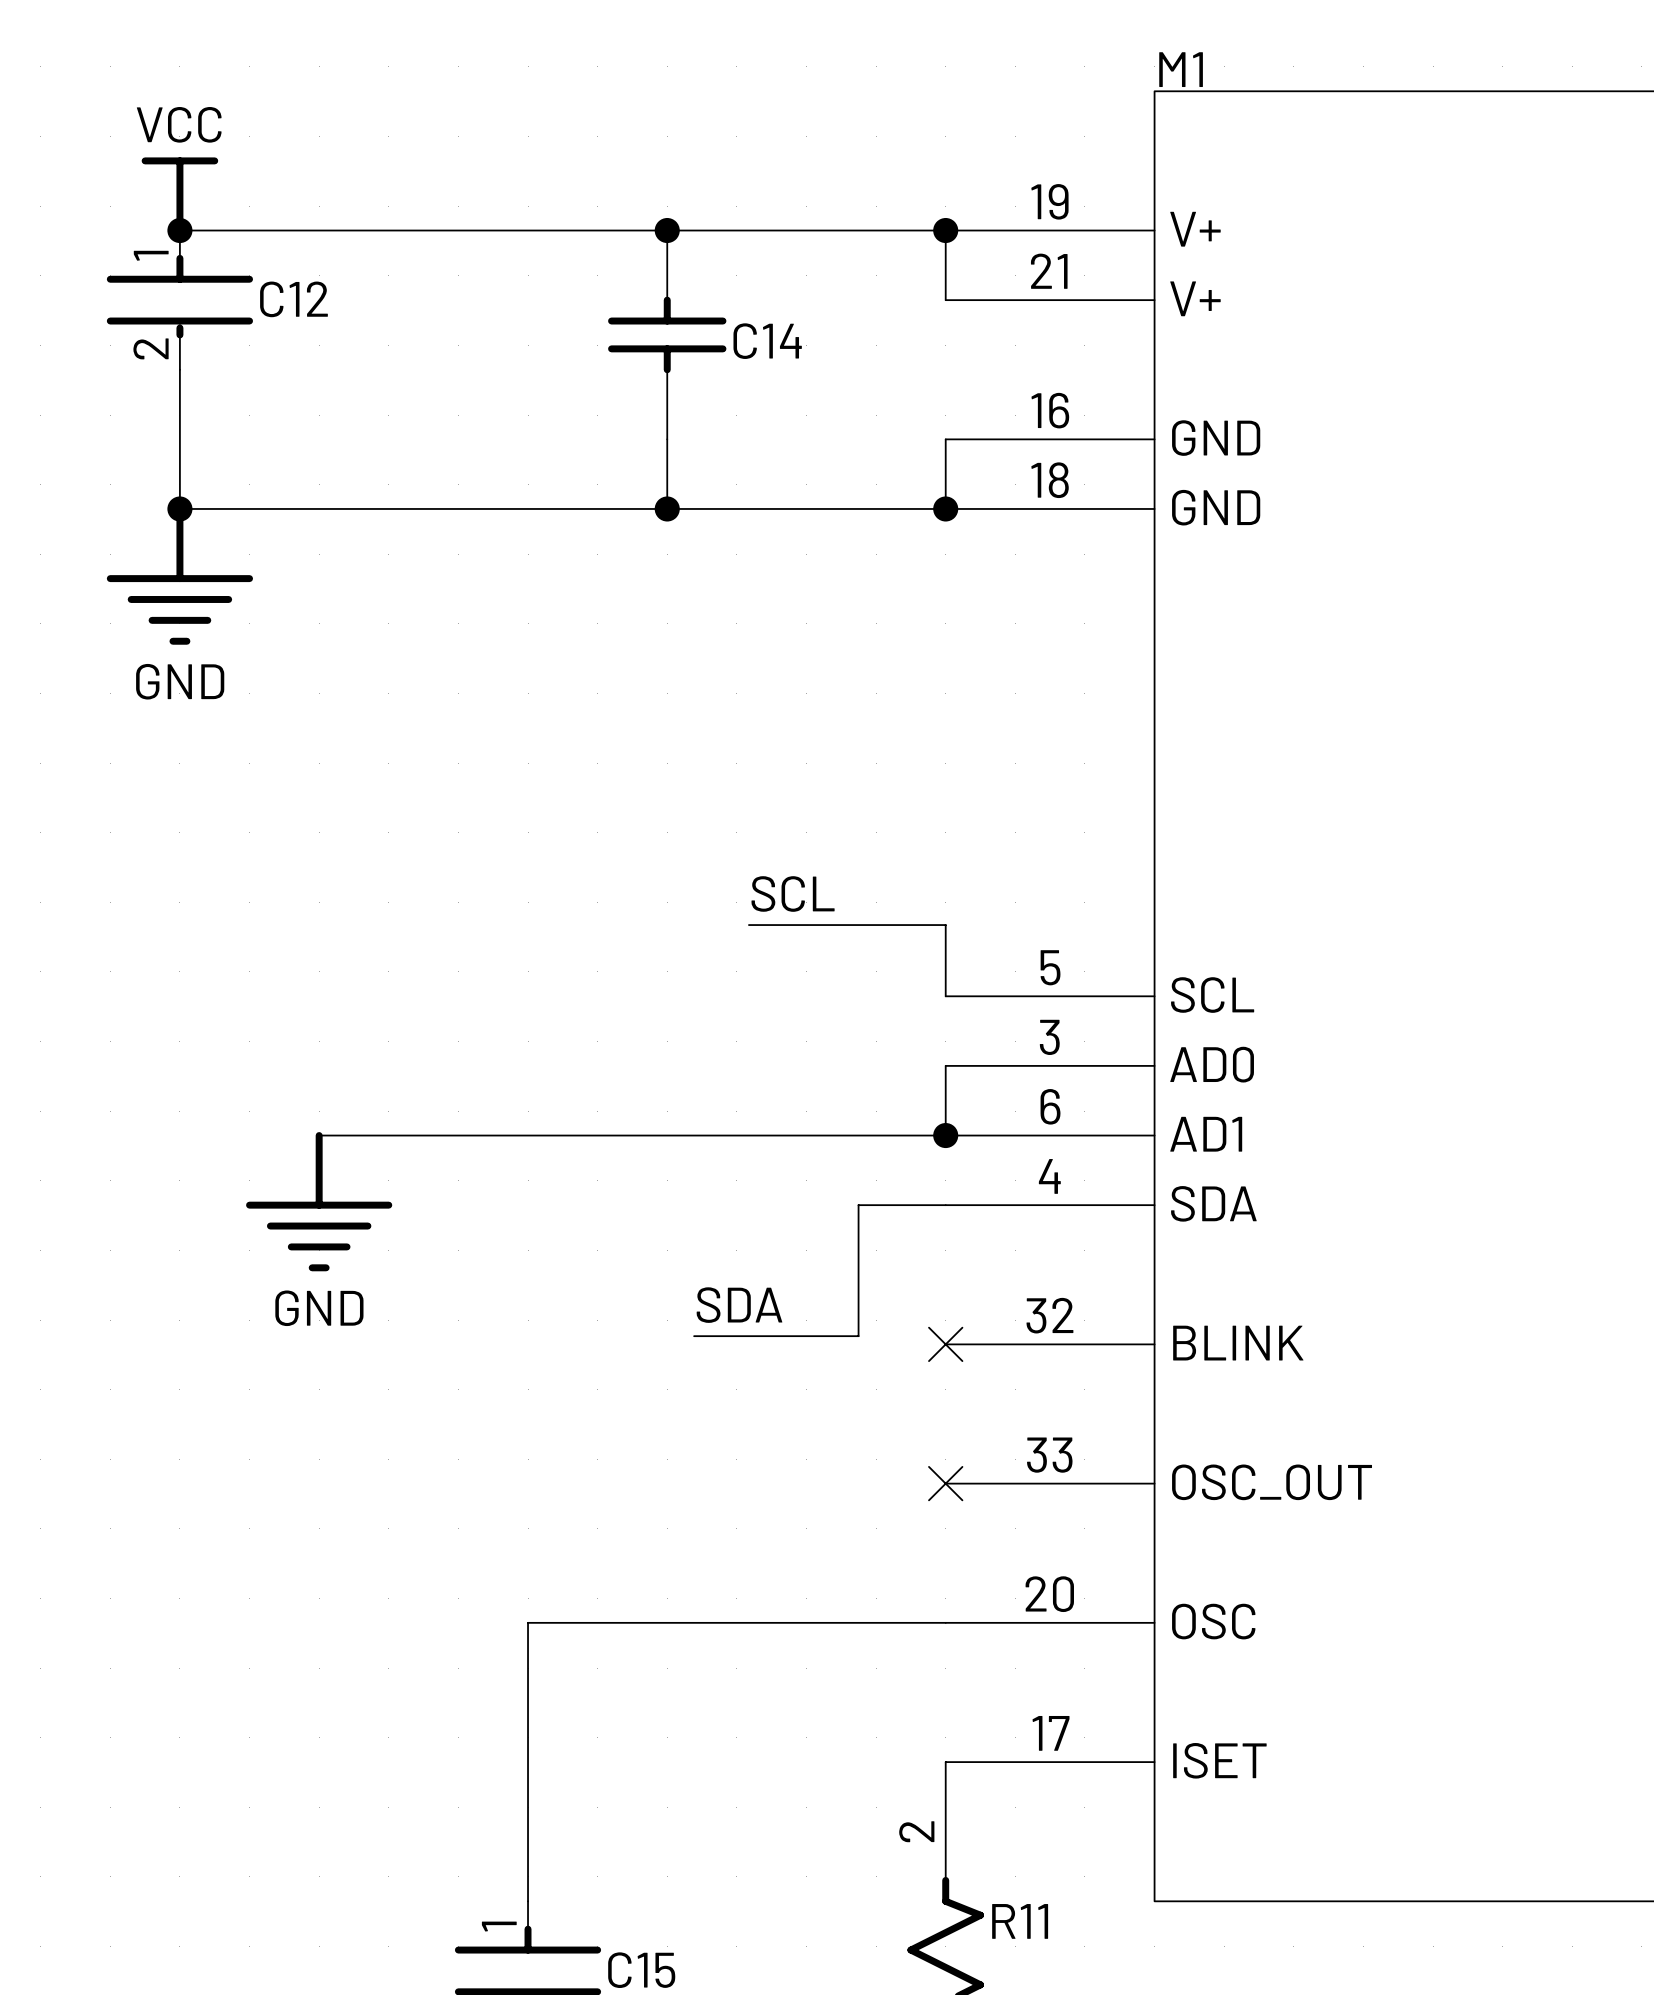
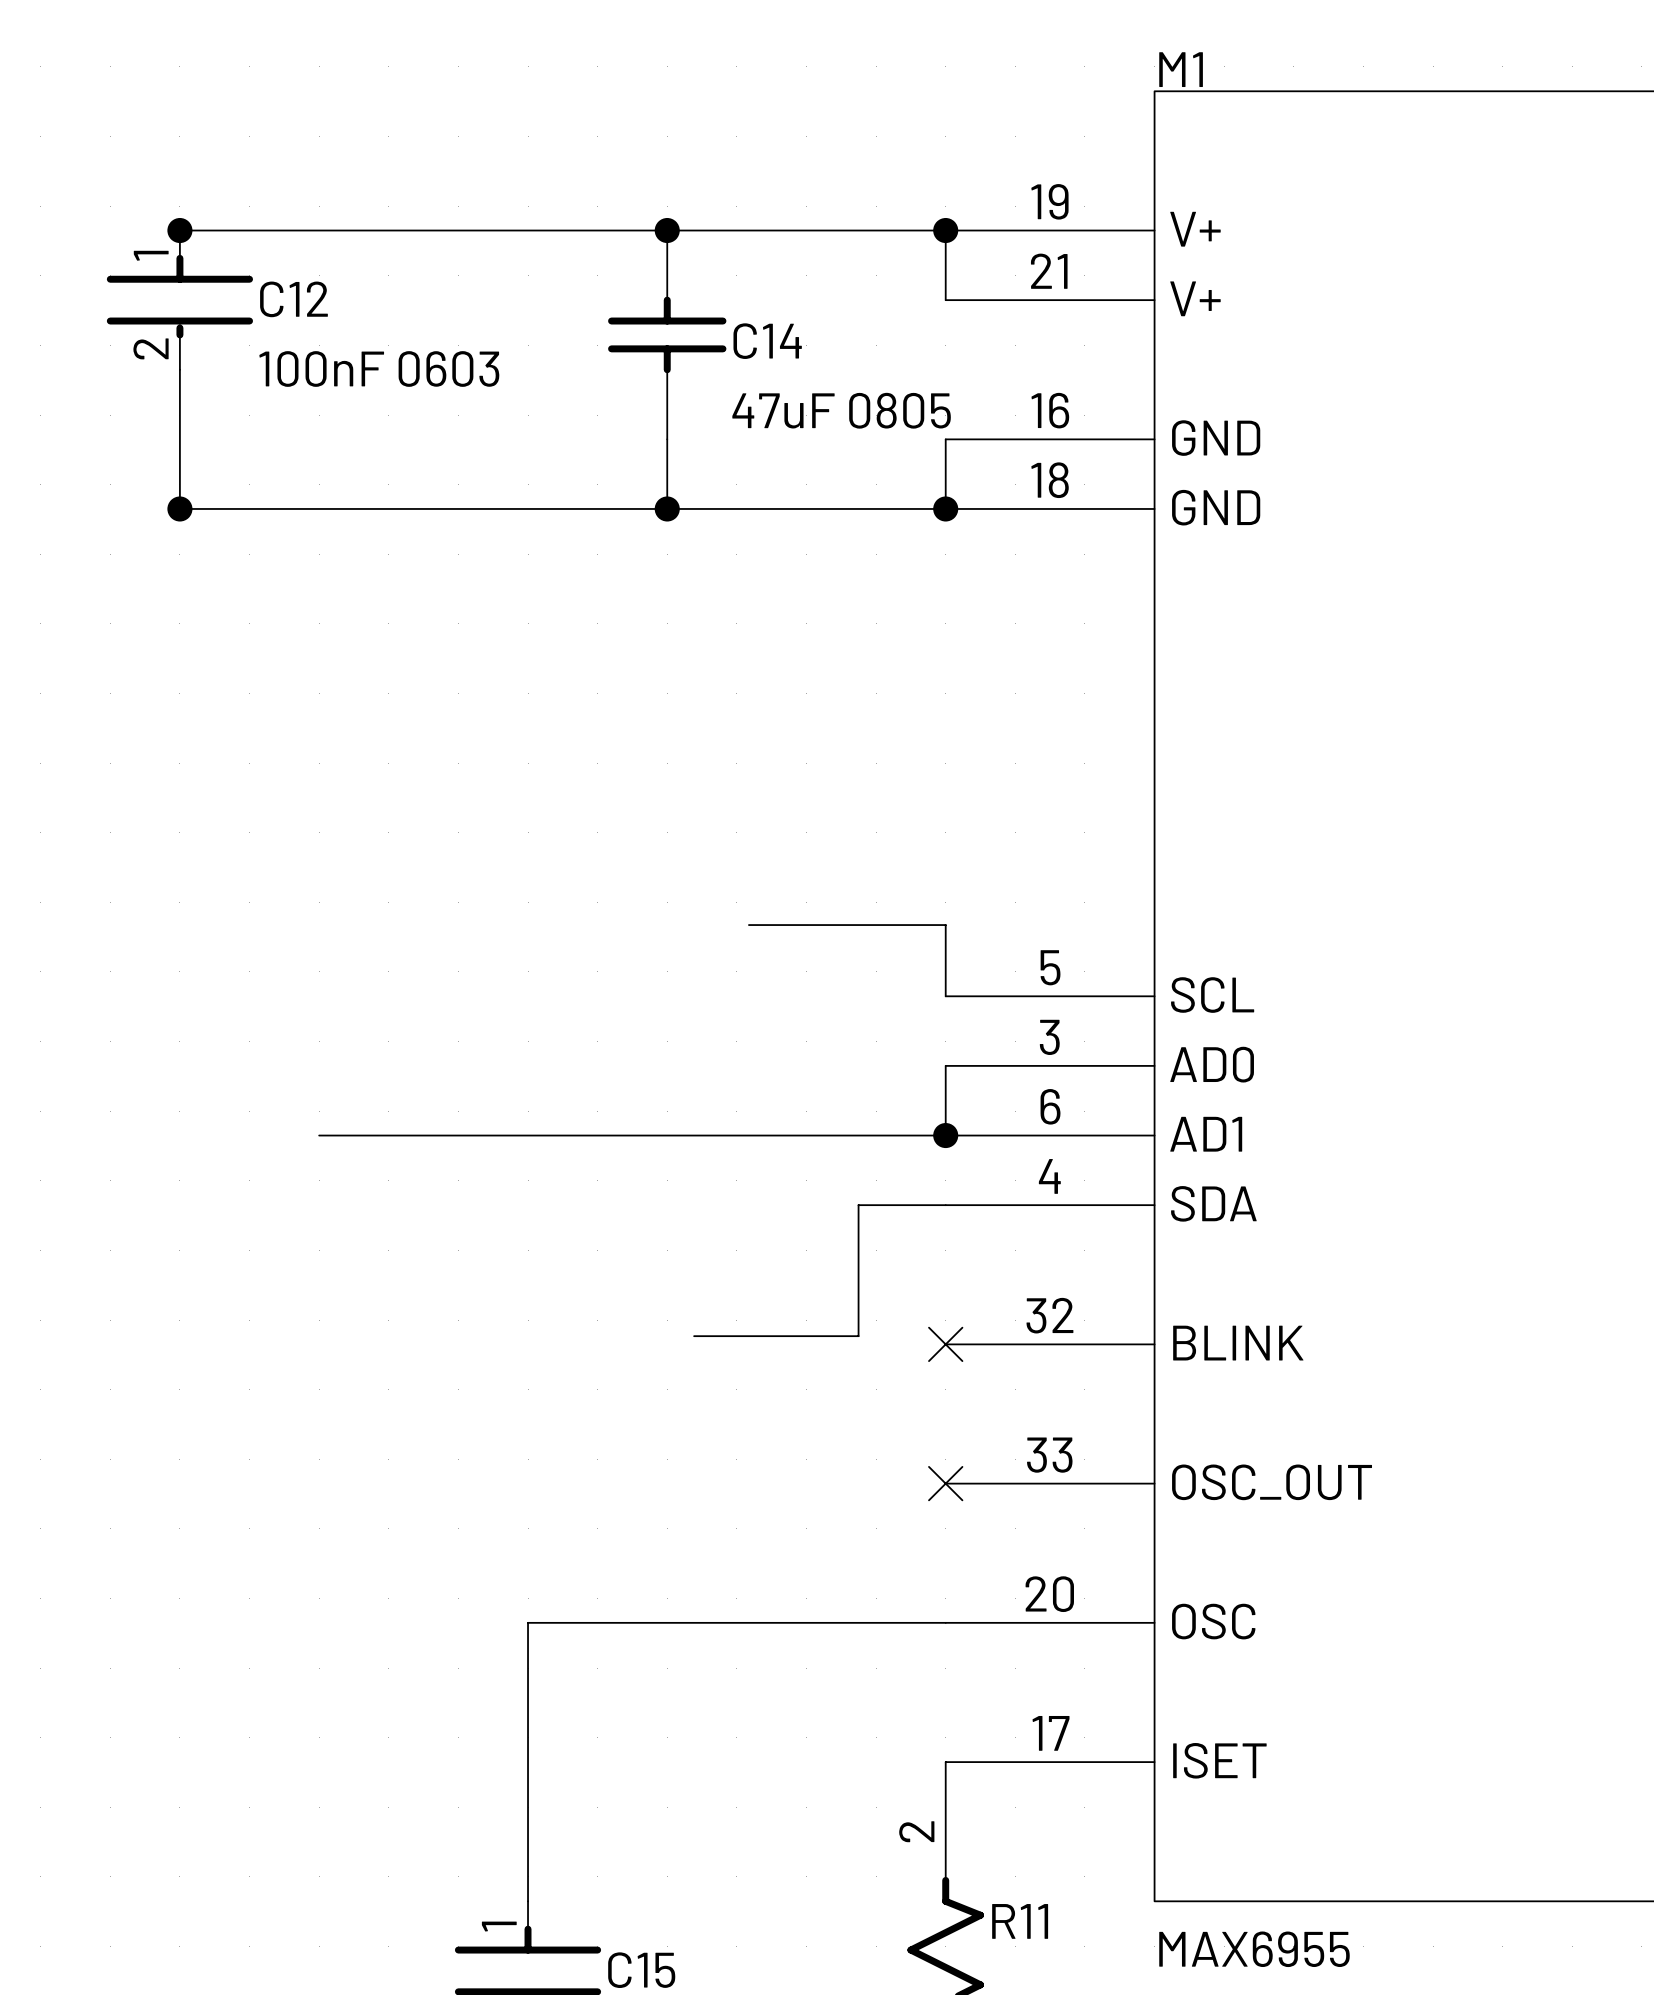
power symbol: VCC (179, 195) -> none
C12 value: none -> 100nF 0603 (379, 368)
C14 value: none -> 47uF 0805 (841, 410)
power symbol: GND (179, 575) -> none
label: SCL (793, 894) -> none
power symbol: GND (319, 1201) -> none
label: SDA (739, 1305) -> none
M1 value: none -> MAX6955 (1254, 1949)

